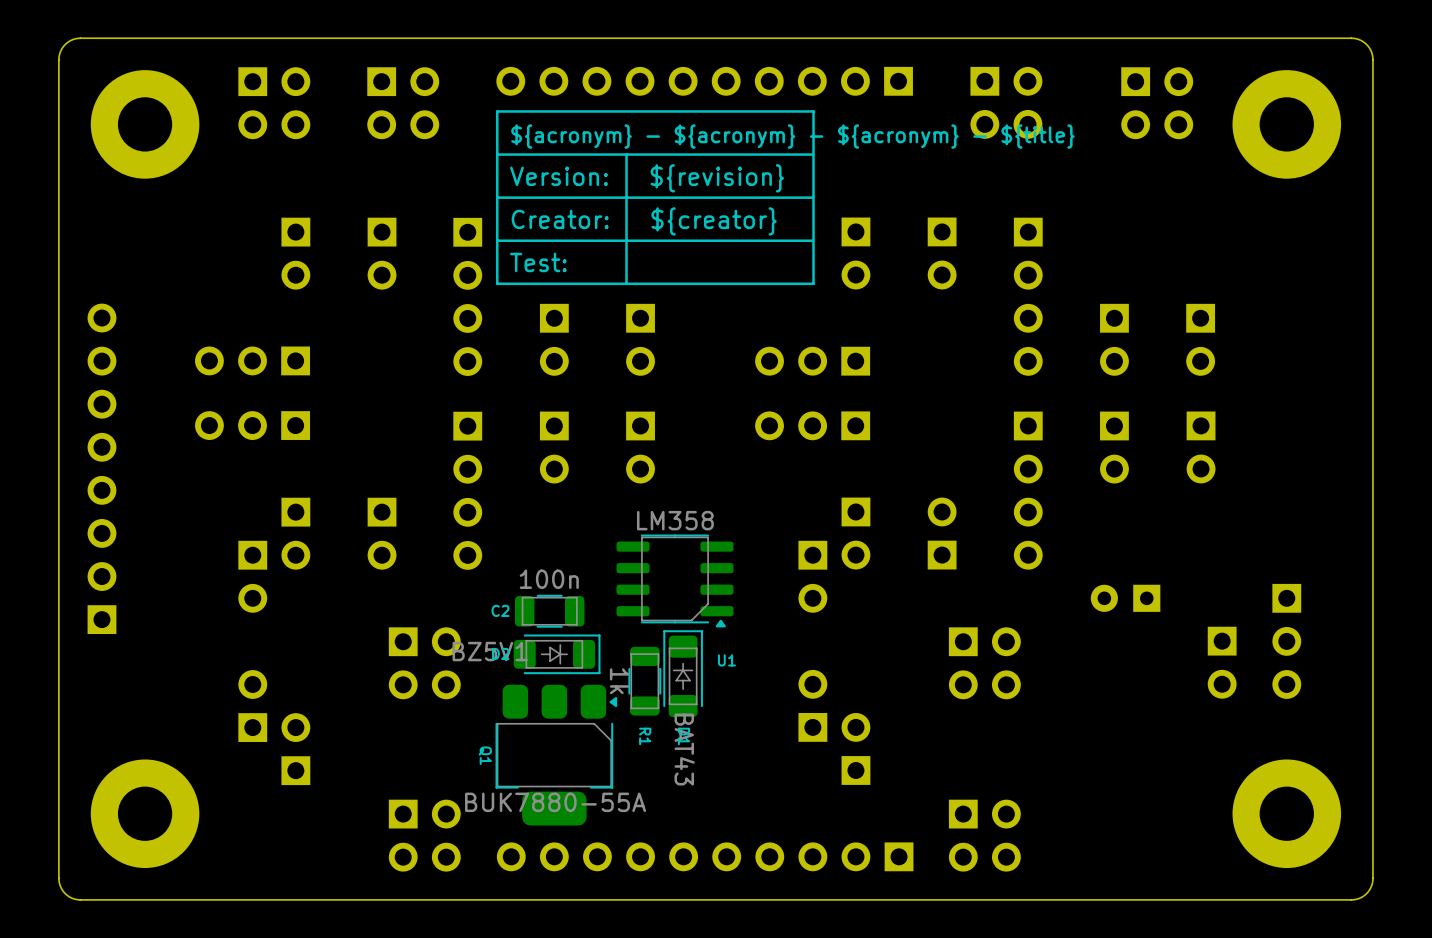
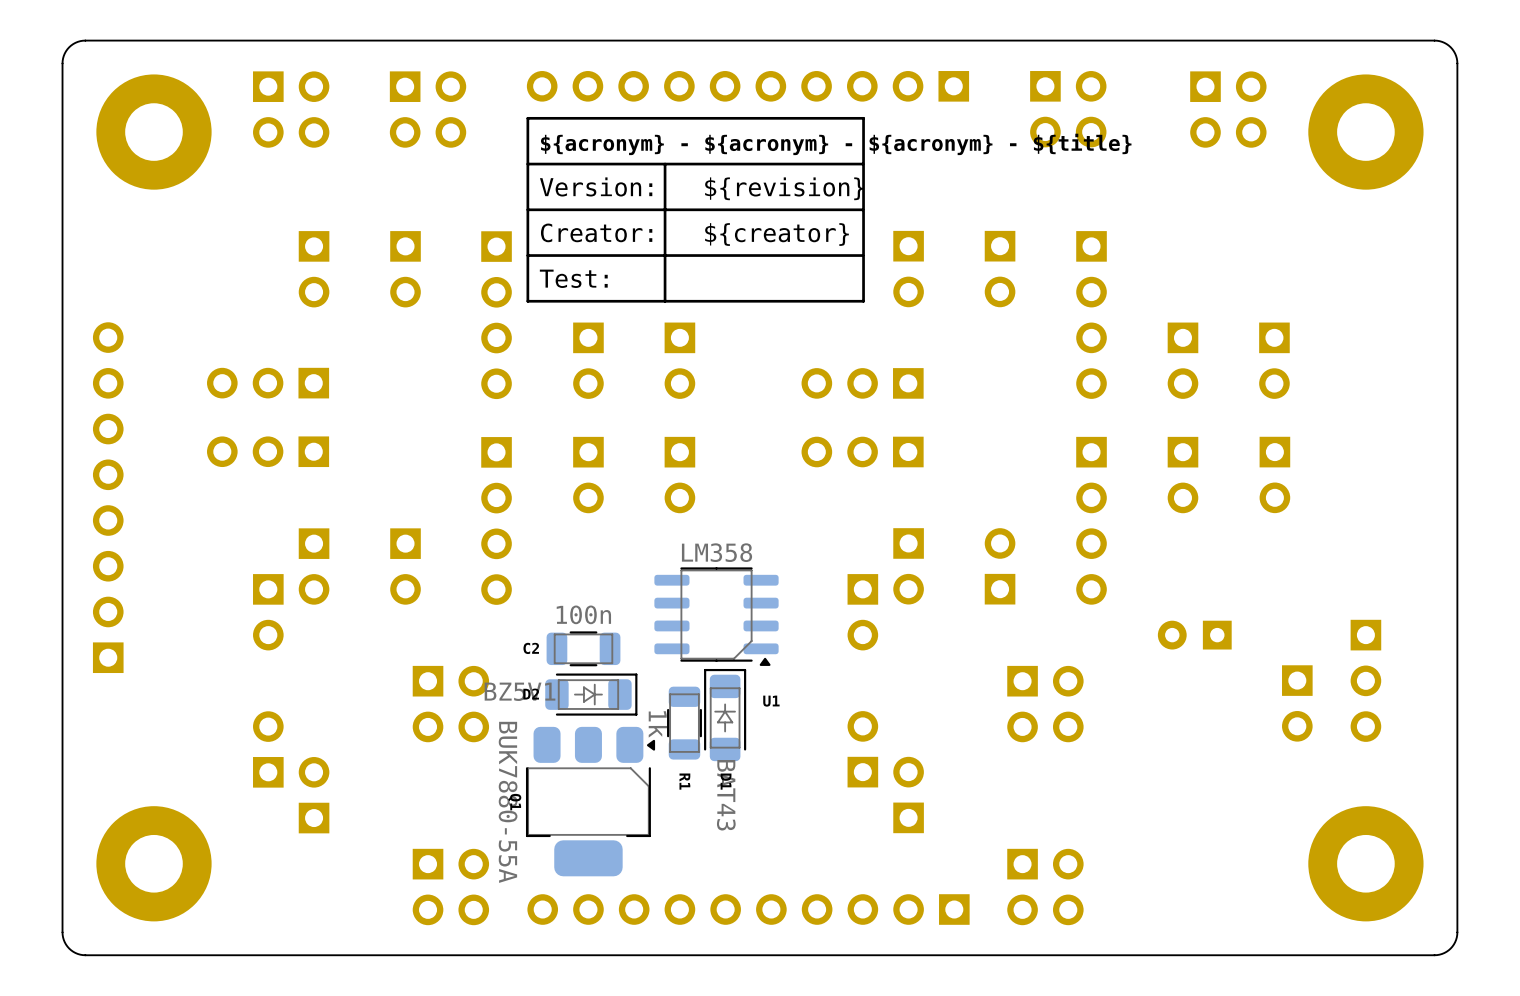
Q1 value rotation: 0° (555, 802) -> 90° clockwise (508, 802)

